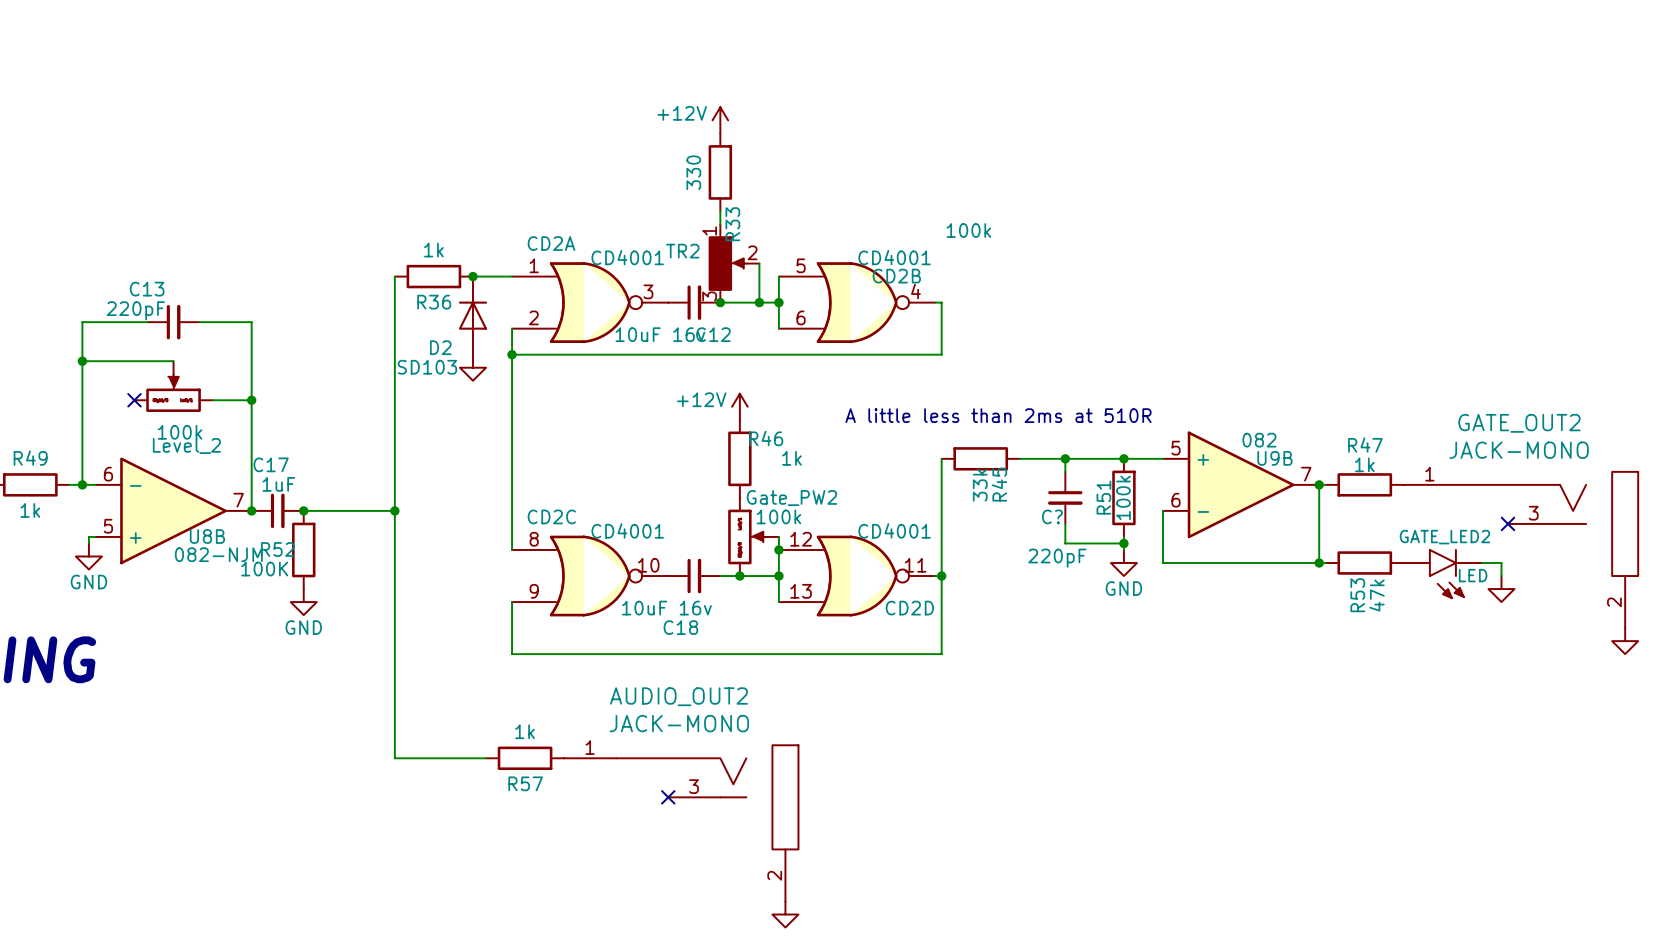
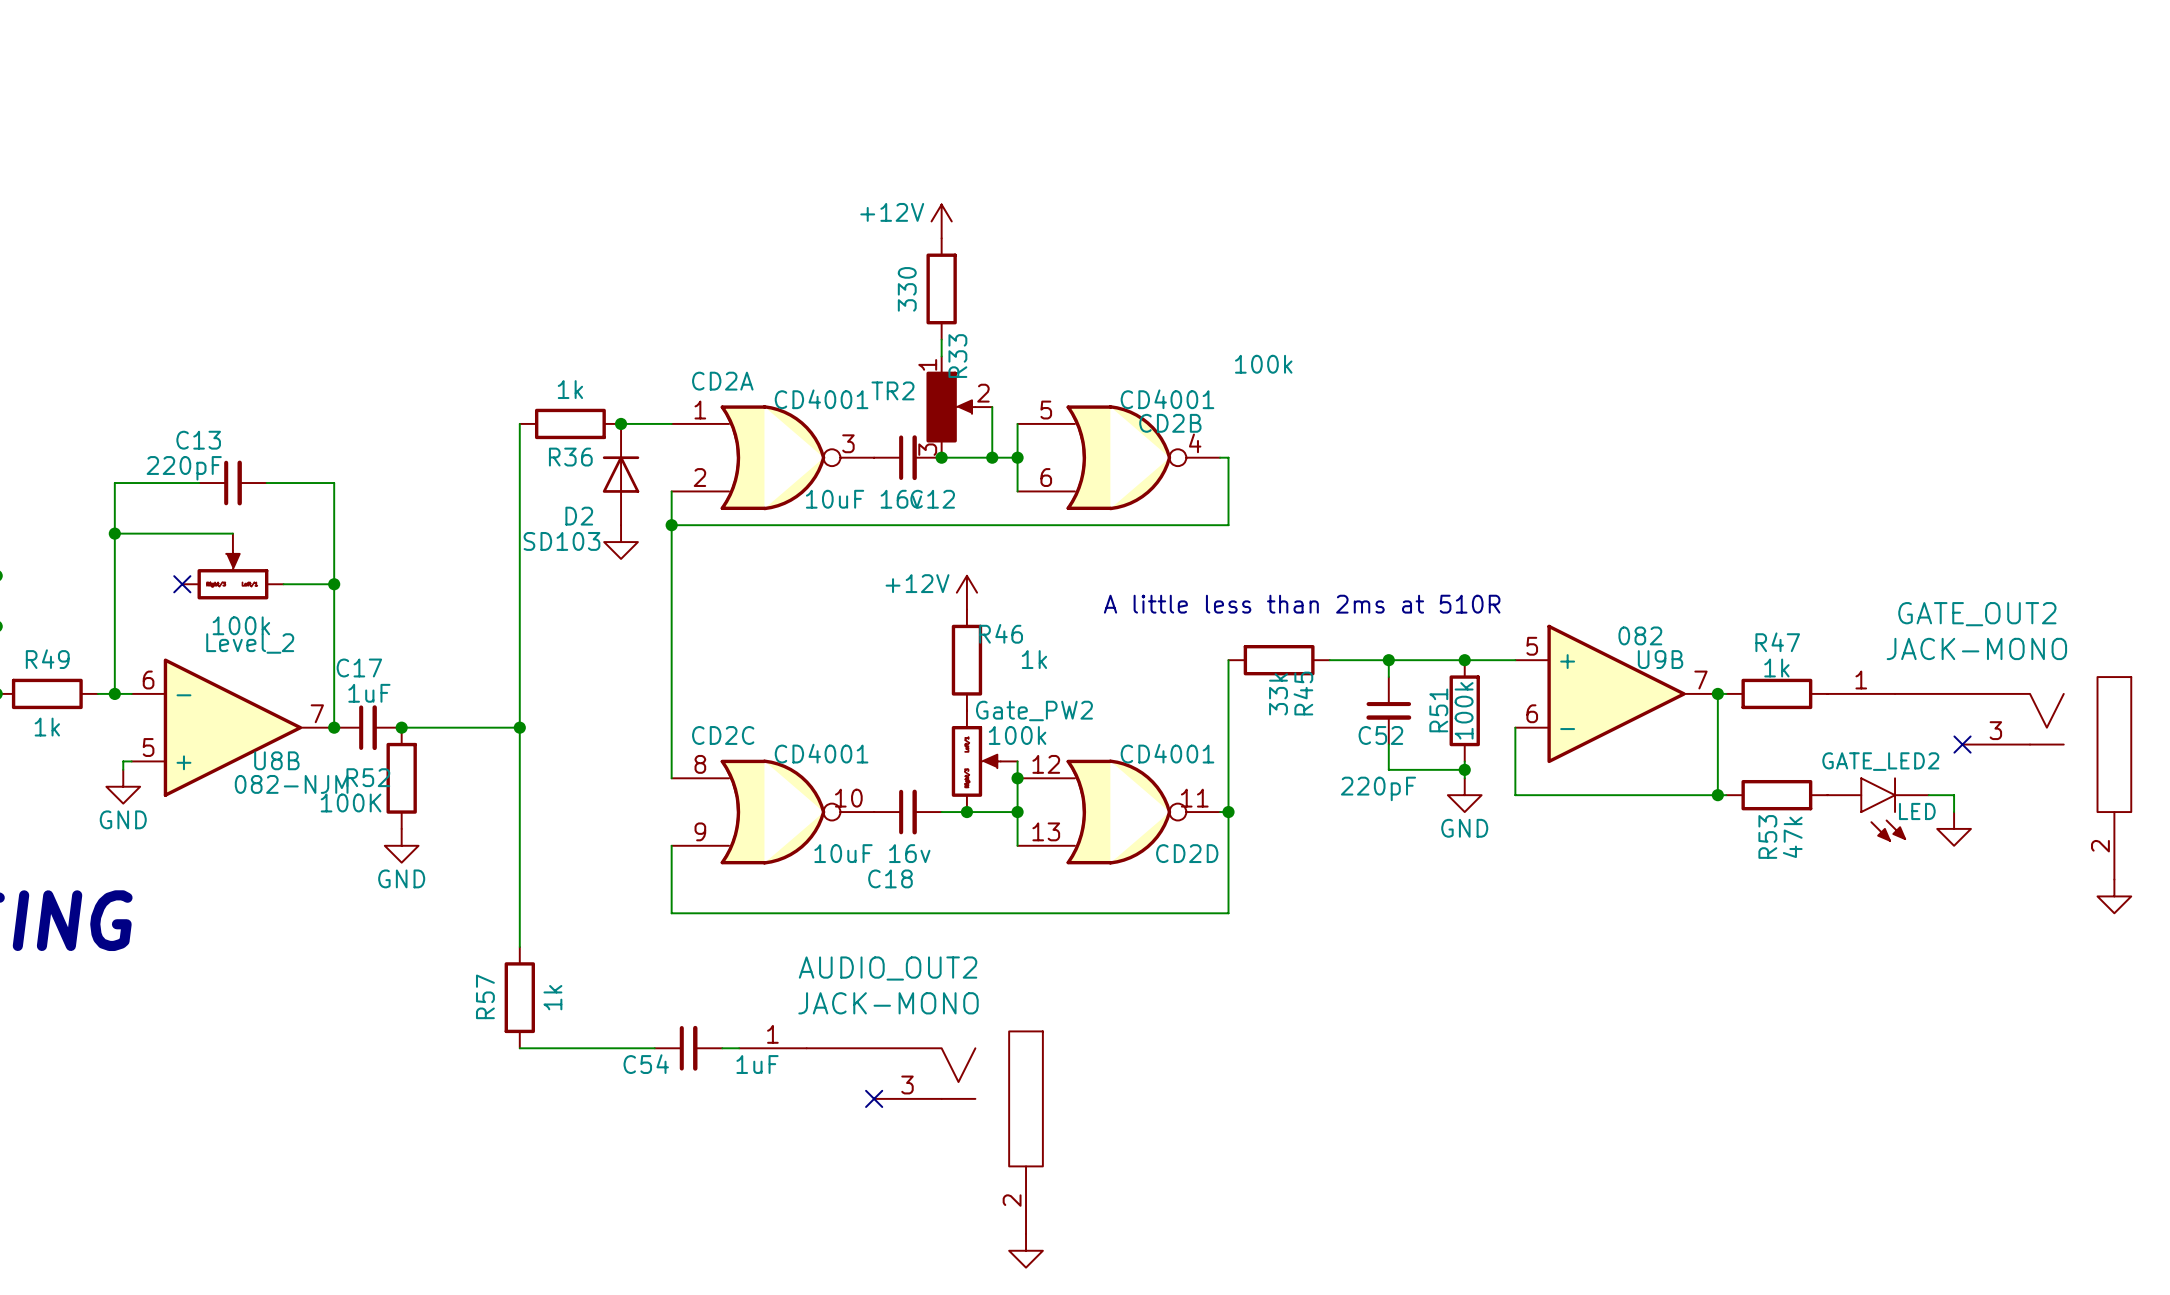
C? name: C? (1052, 516) -> C52 (1380, 735)
wire: (394, 680) (394, 758) -> none
R57 rotation: 0° (525, 758) -> 90° clockwise (519, 997)
R57 position: (525, 758) -> (519, 997)
C54: none -> 1uF (688, 1048)

